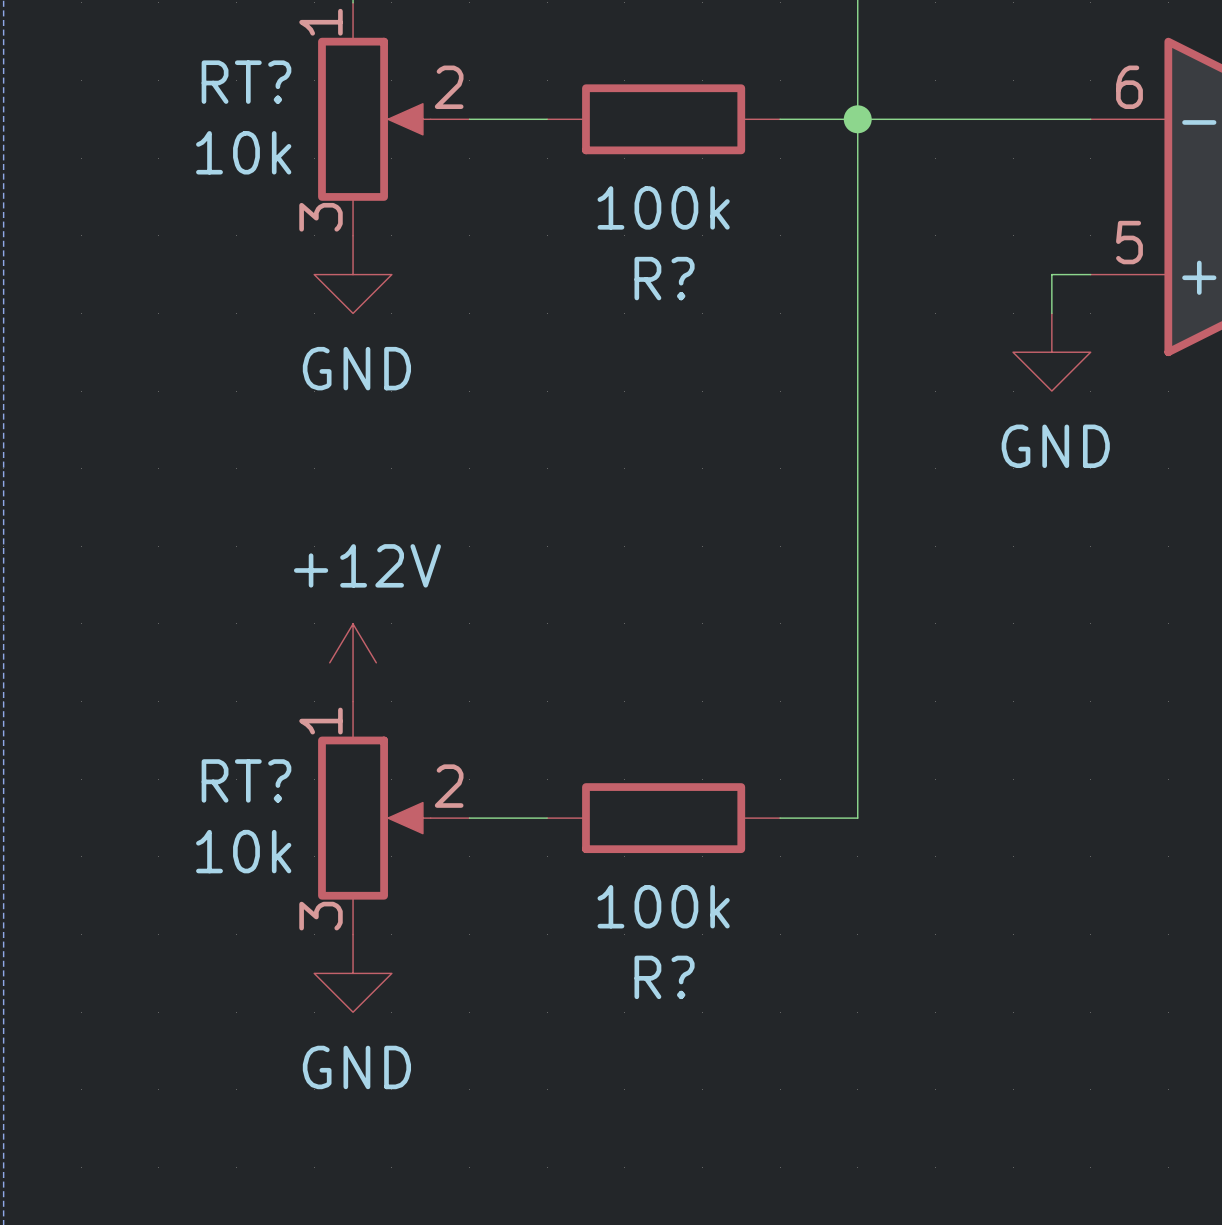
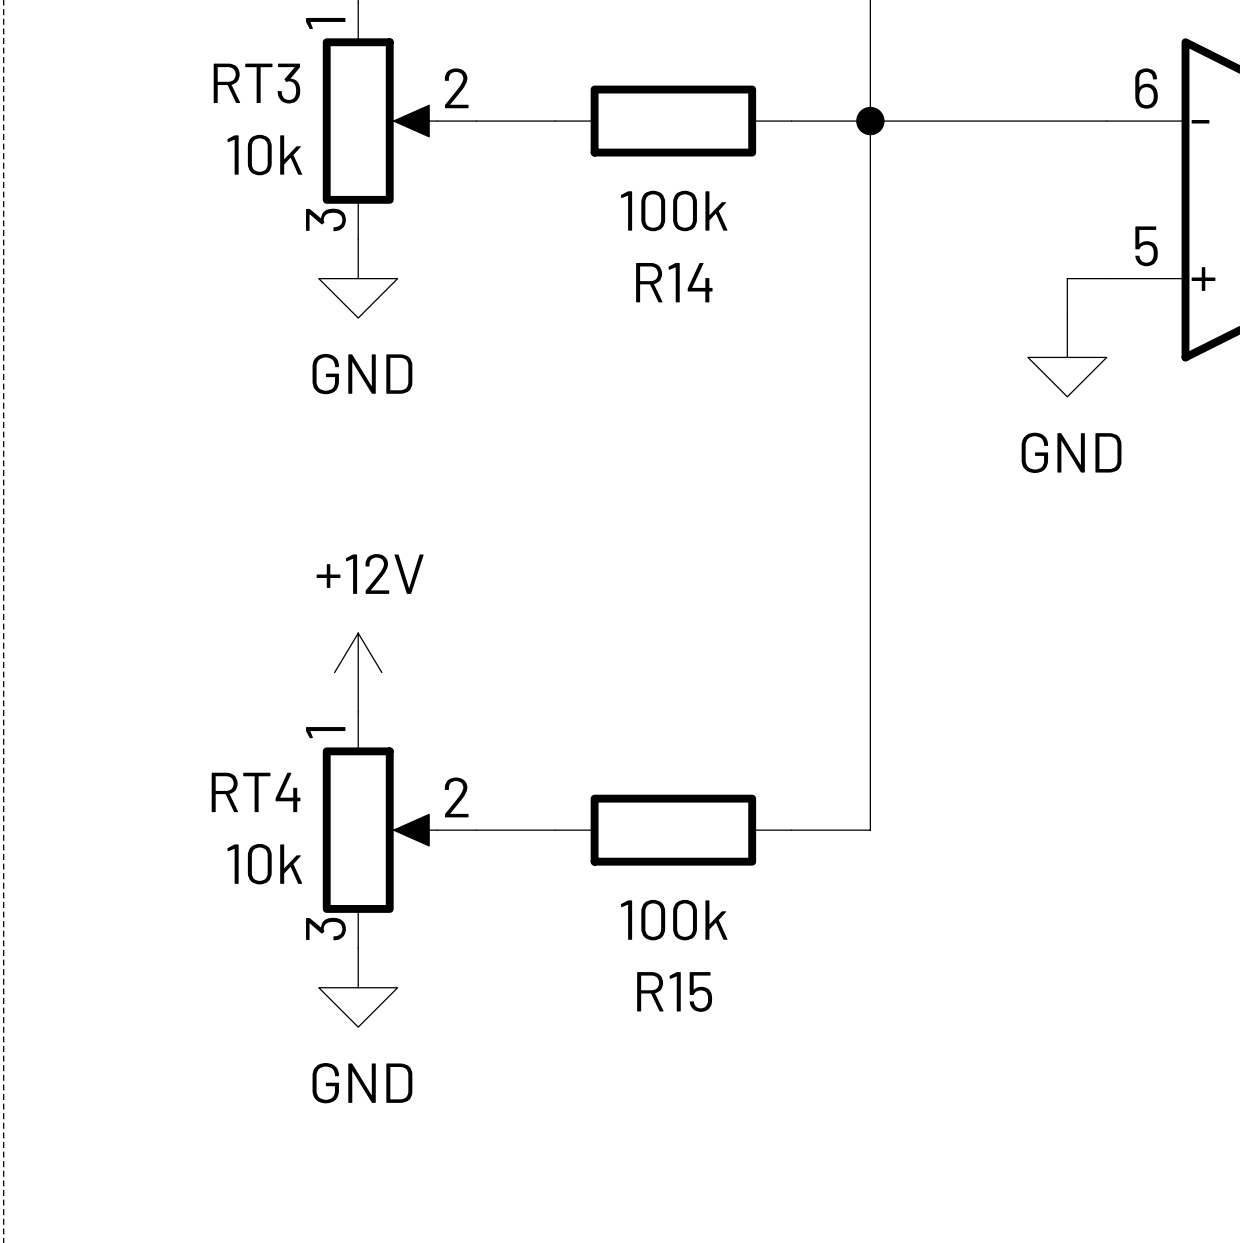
RT? name: RT? (246, 82) -> RT3 (256, 83)
R? name: R? (664, 278) -> R14 (674, 282)
RT? name: RT? (246, 780) -> RT4 (256, 792)
R? name: R? (664, 977) -> R15 (674, 991)

